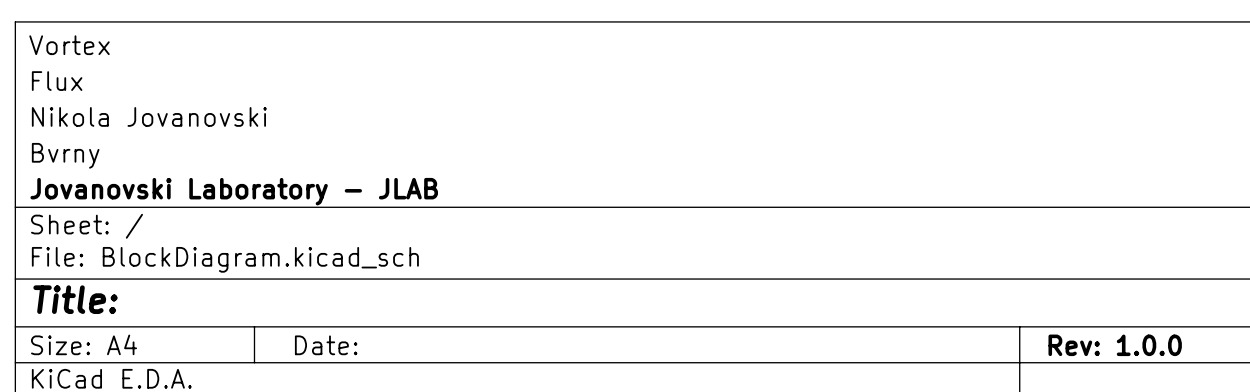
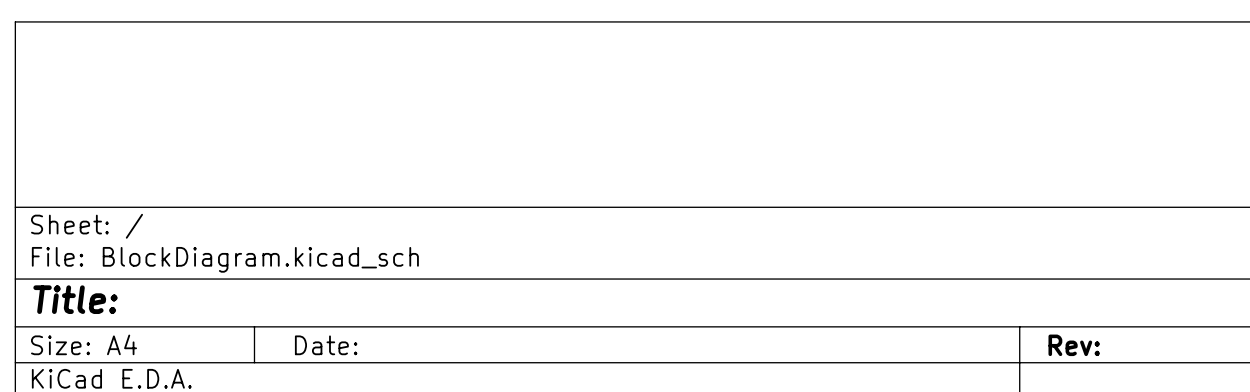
title block: Vortex (69, 45) -> none
title block: Flux (57, 81) -> none
title block: Nikola Jovanovski (149, 116) -> none
title block: Bvrny (65, 155) -> none
title block: Jovanovski Laboratory - JLAB (234, 191) -> none
title block: Rev: 1.0.0 (1115, 345) -> Rev: (1074, 345)

